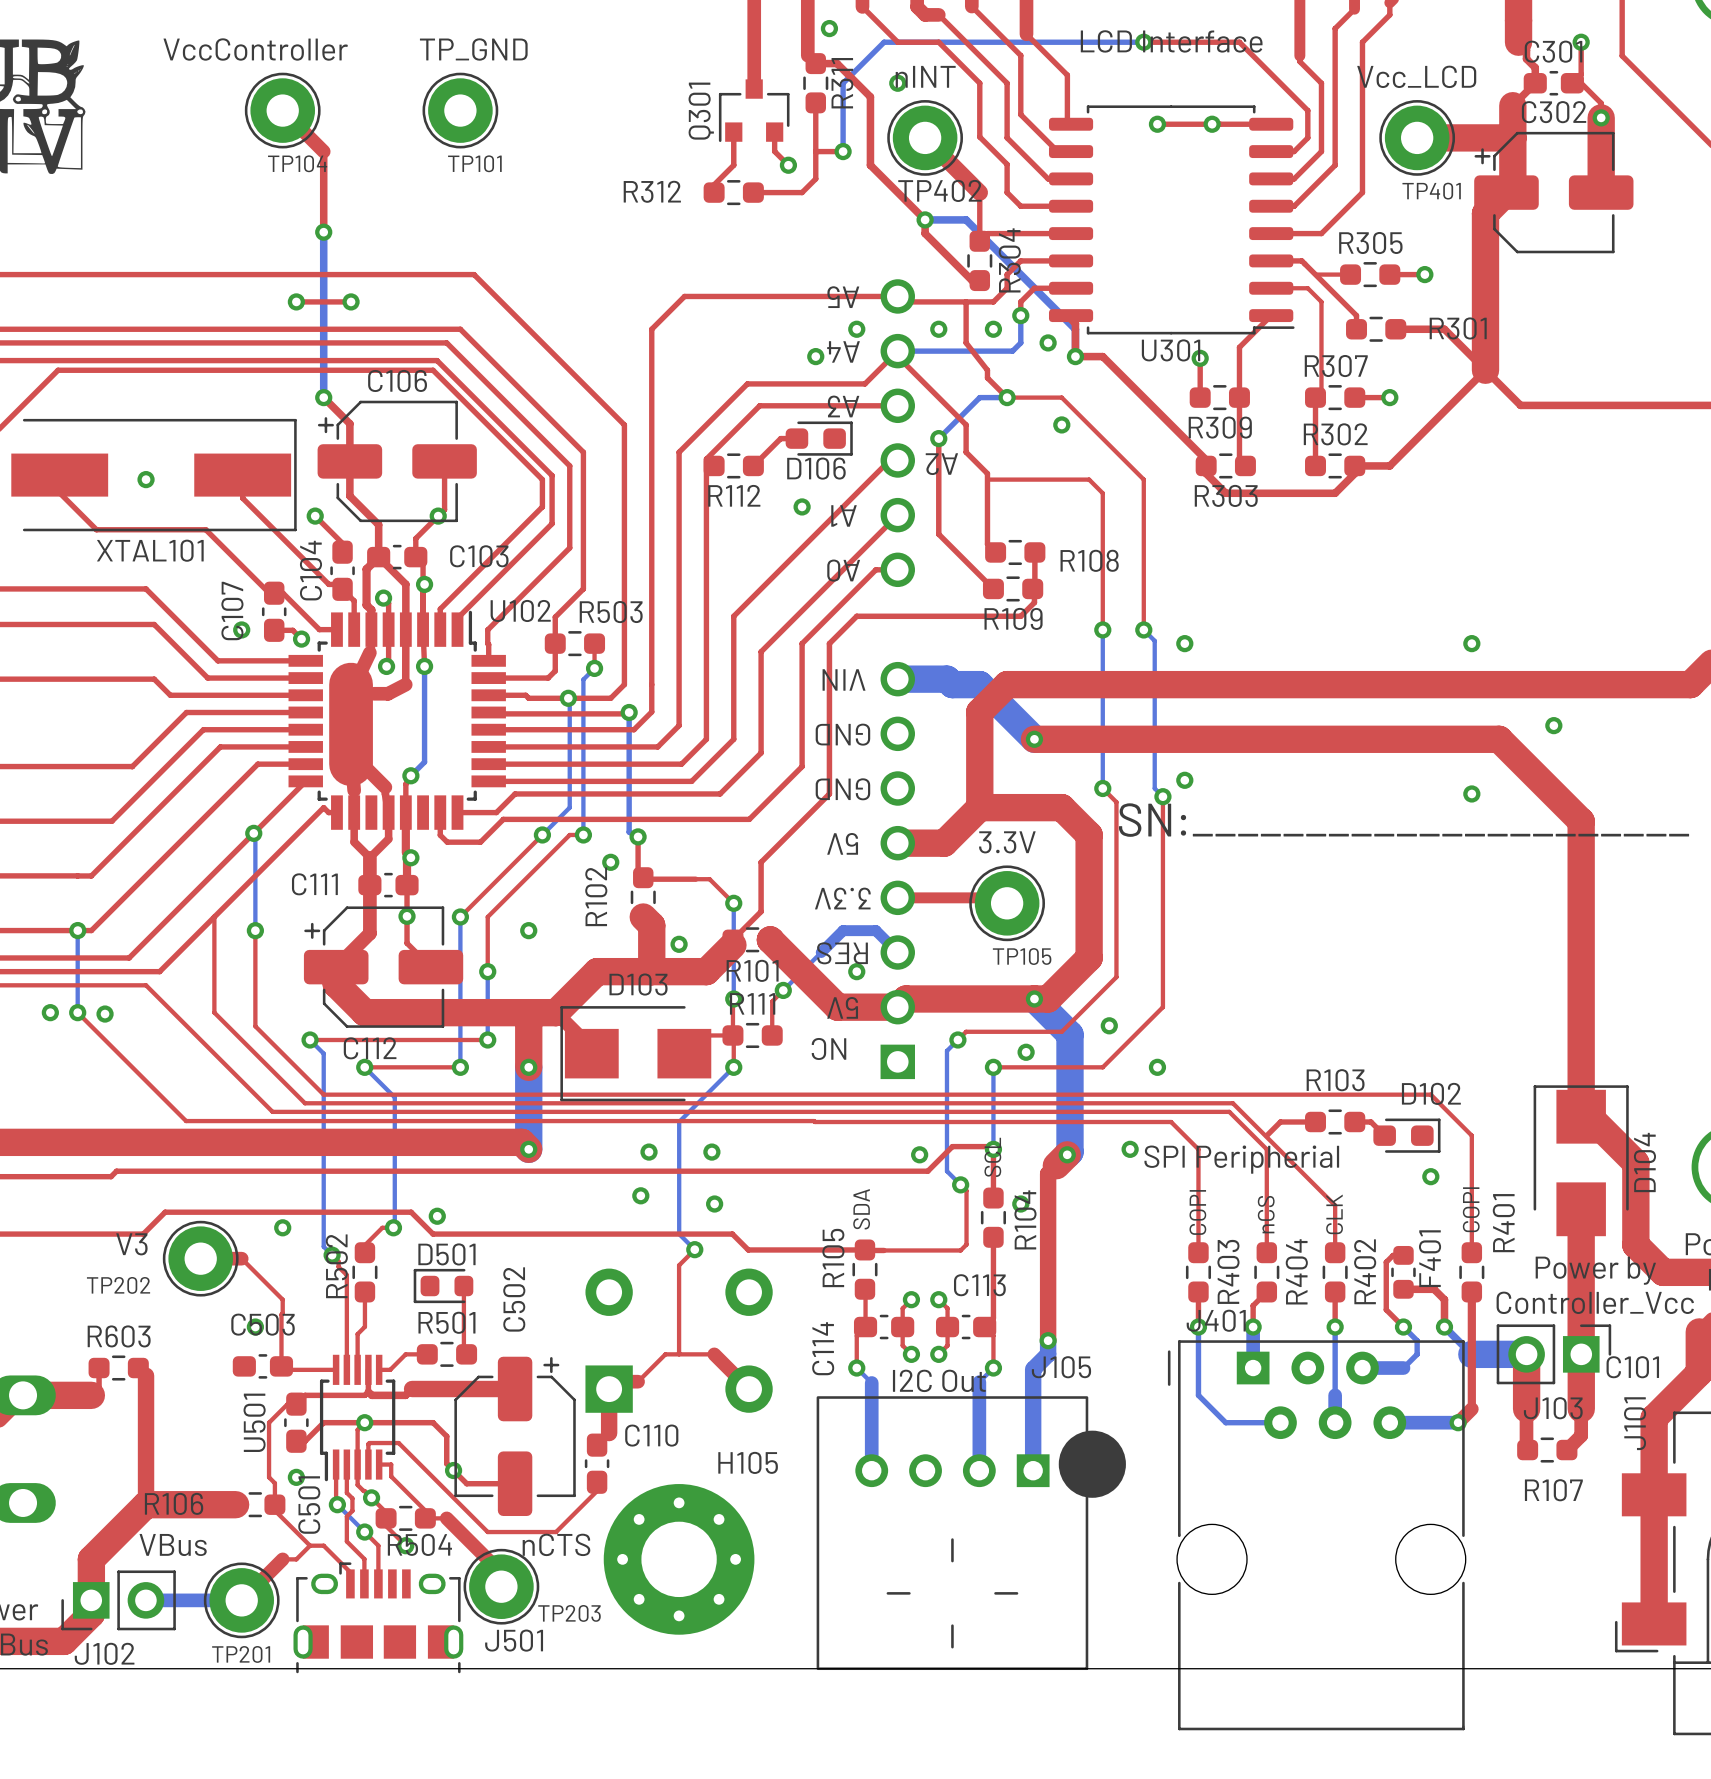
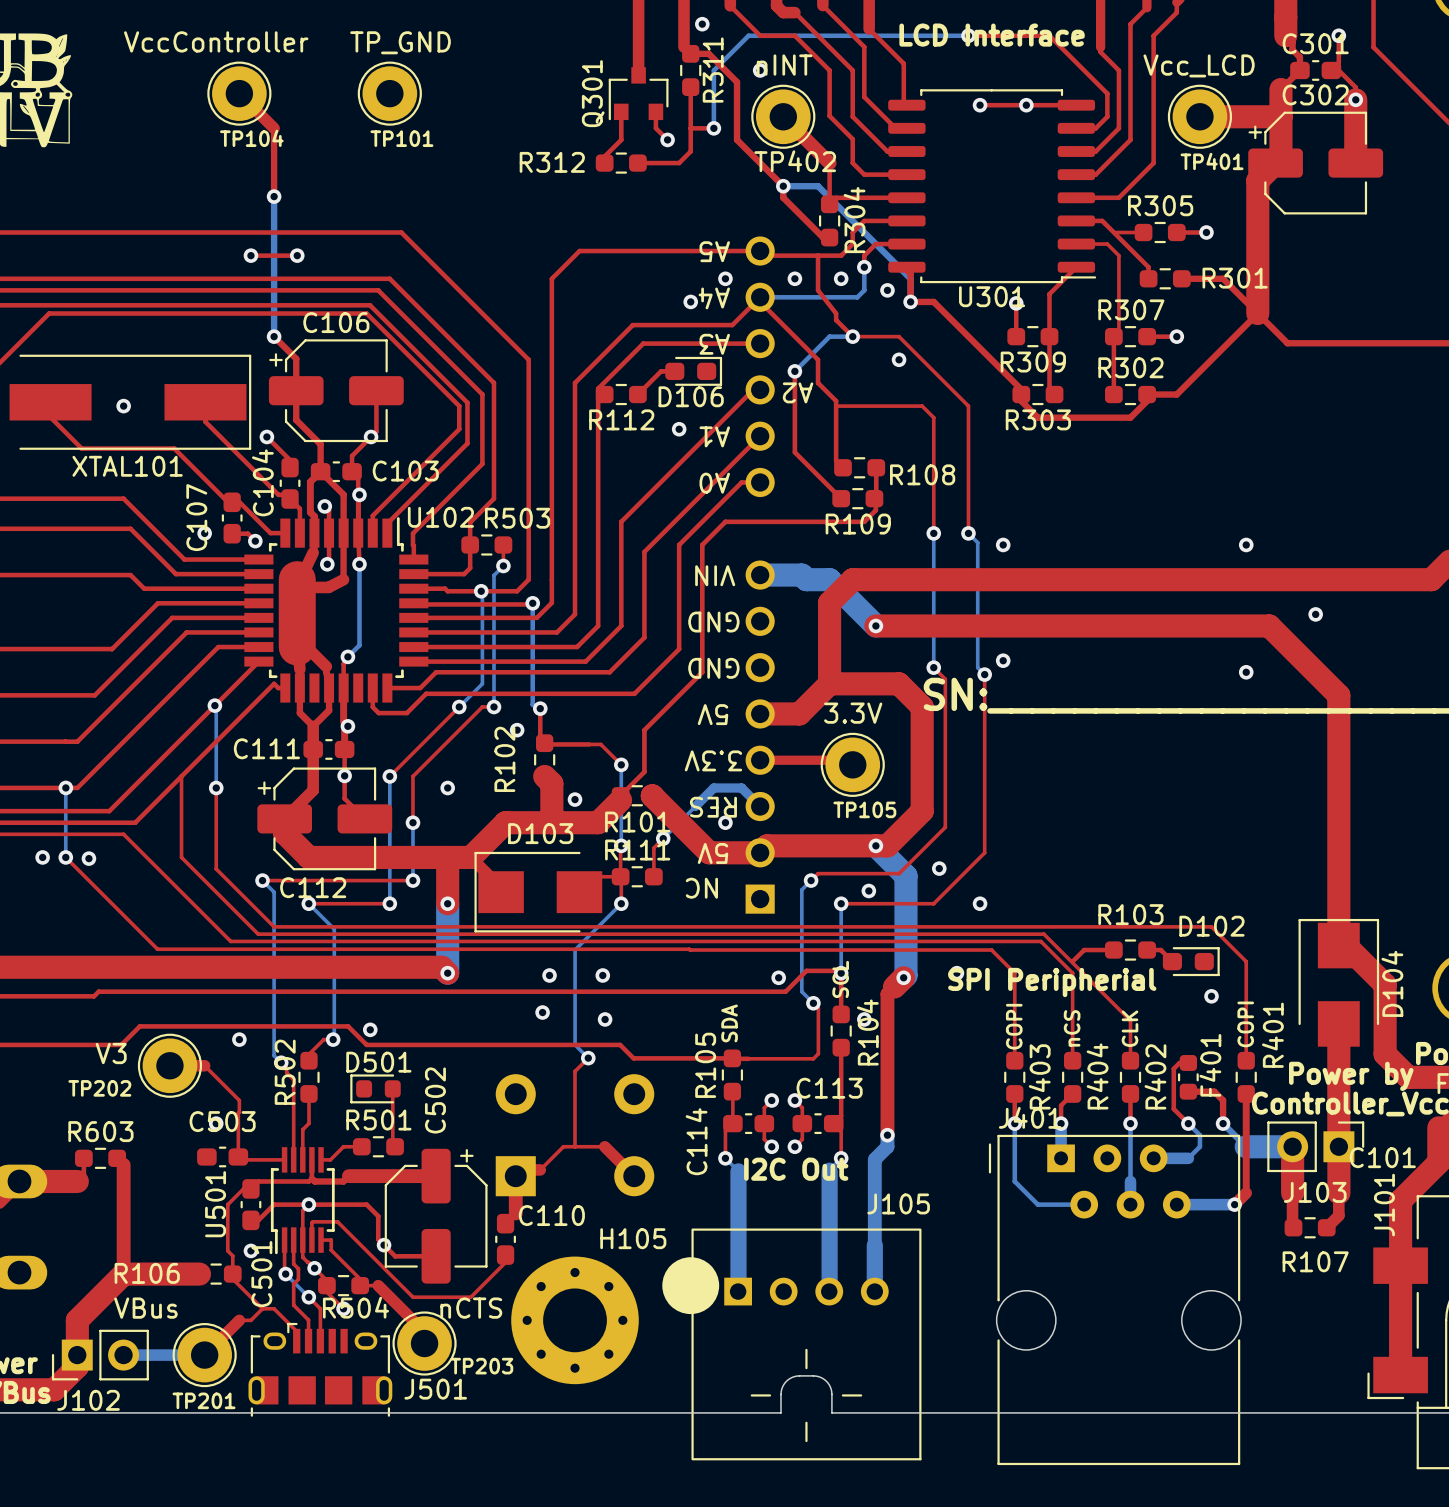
bottom track: (871, 1382) (871, 1470) -> (738, 1171) (738, 1291)
bottom track: (979, 1382) (979, 1470) -> (829, 1170) (829, 1291)
J105 footprint: [816, 1396, 1126, 1671] -> [662, 1228, 922, 1461]
bottom track: none -> (874, 1245) (874, 1291)
board edge: (922, 1668) (982, 1668) -> (781, 1412) (781, 1392) (783, 1385) (790, 1378) (799, 1375) (818, 1376) (828, 1383) (831, 1392) (831, 1412)

